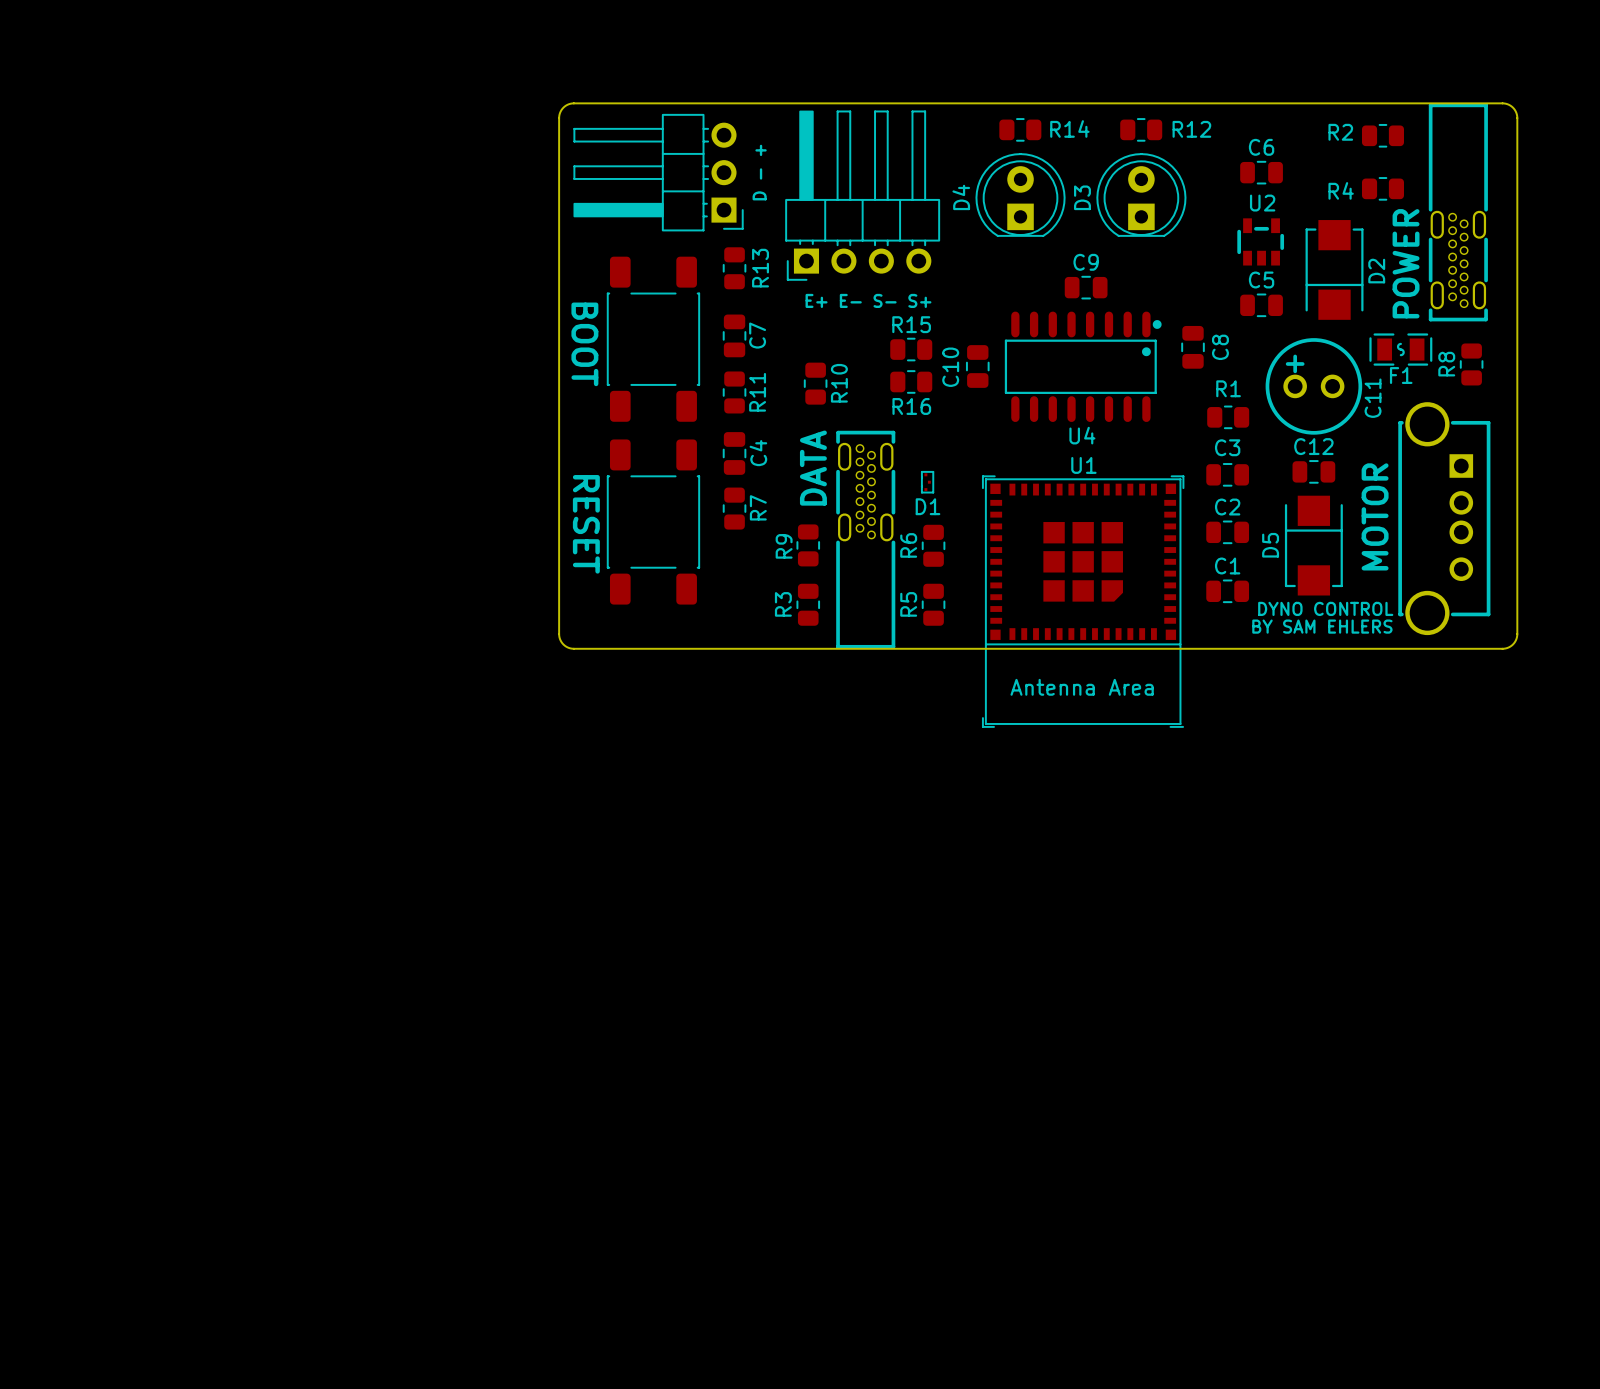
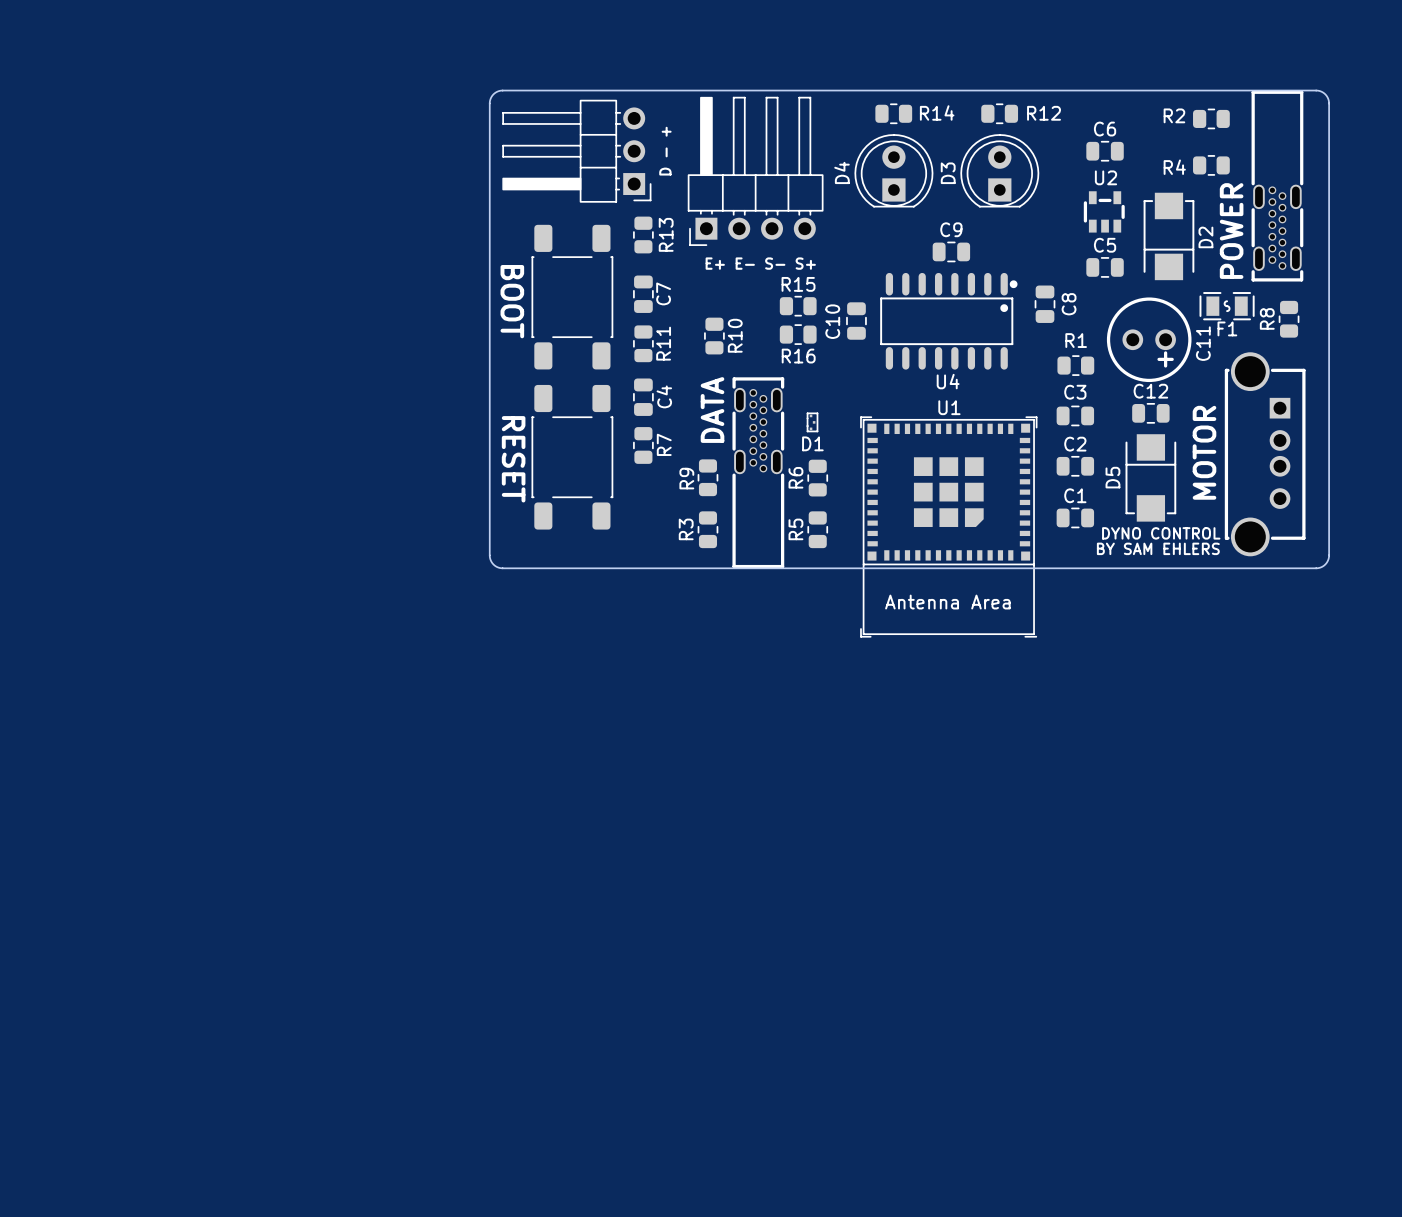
C11 rotation: 0° (1313, 386) -> 180° (1149, 339)

